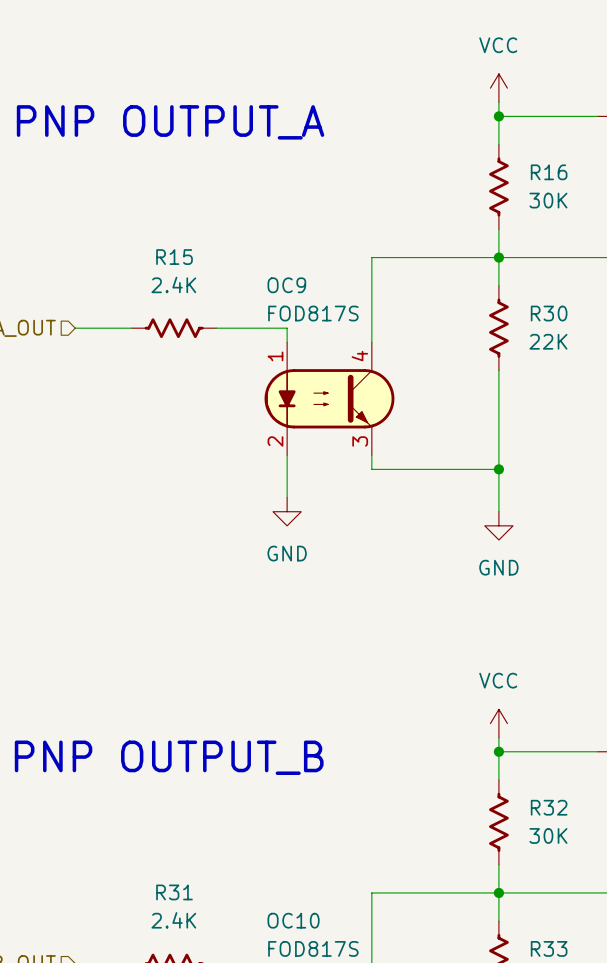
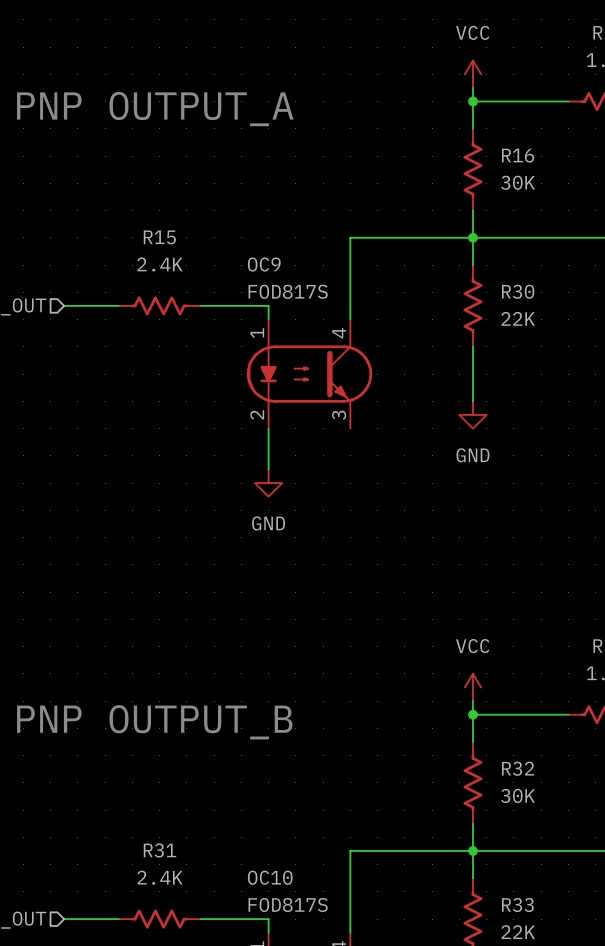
wire: (498, 427) (498, 511) -> none
wire: (371, 455) (371, 469) (498, 469) -> none
junction: (498, 469) -> none
power symbol position: GND (498, 525) -> GND (472, 414)

